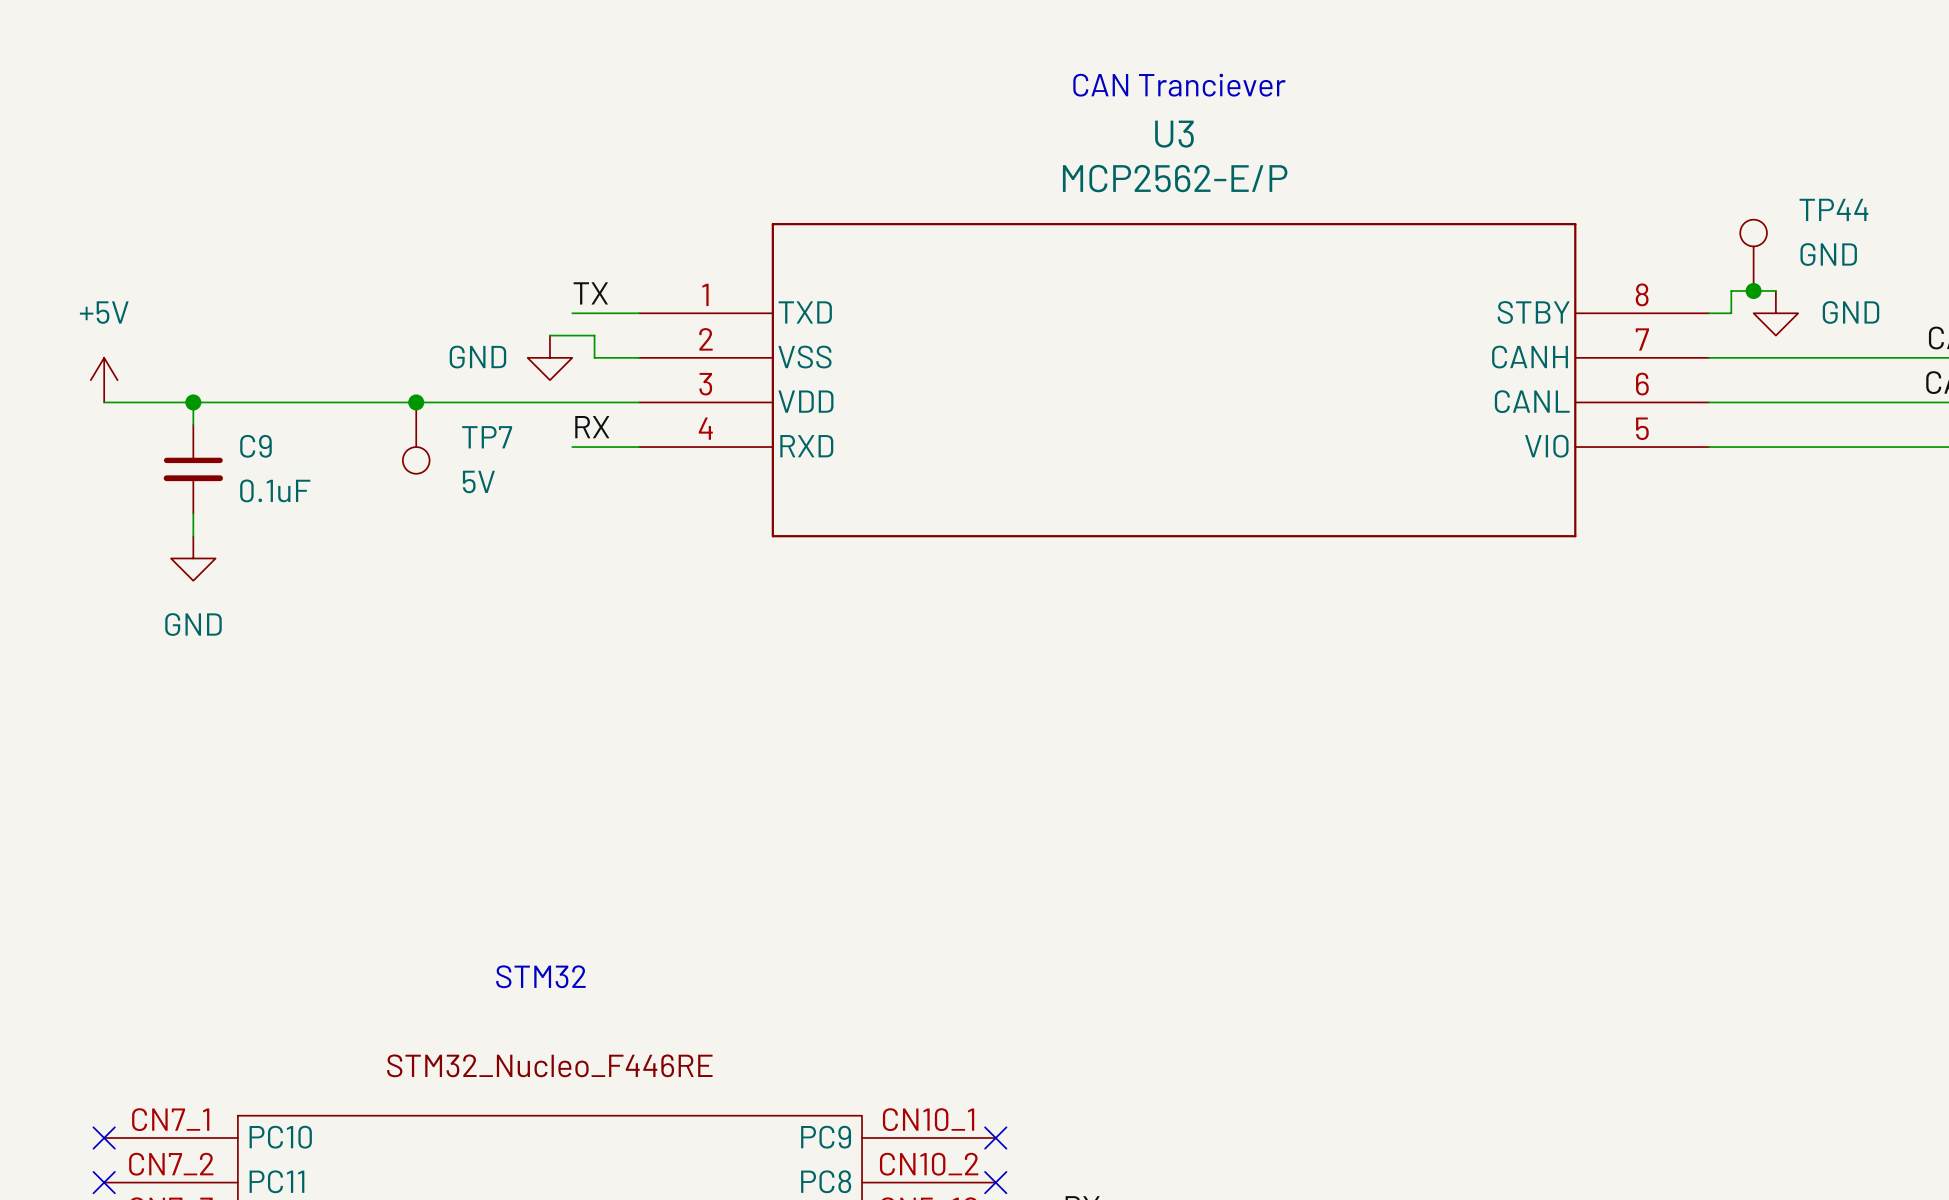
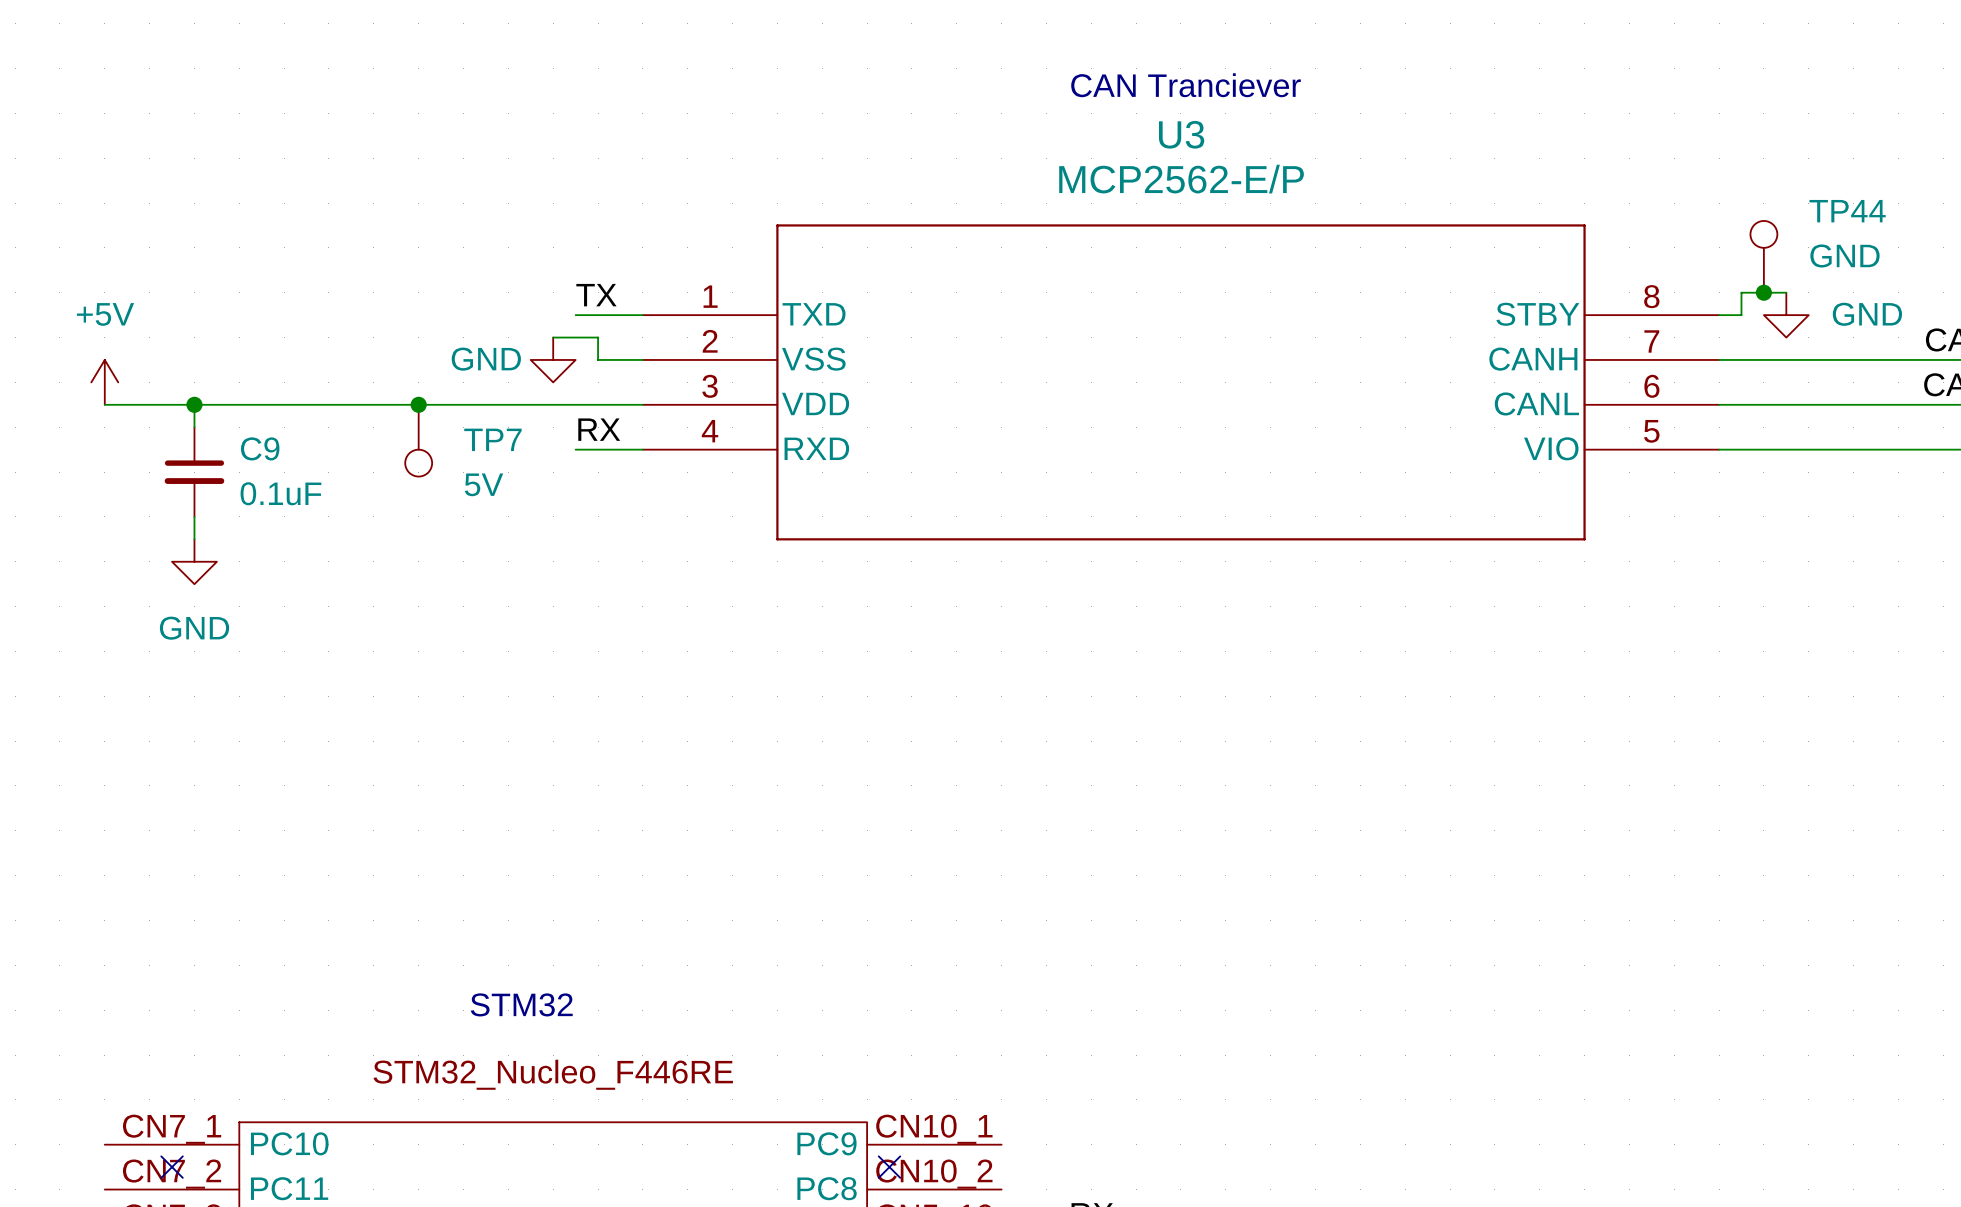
text position: STM32 (540, 976) -> STM32 (521, 1004)
no-connect mark: (104, 1138) -> none
no-connect mark: (995, 1138) -> none
no-connect mark: none -> (172, 1167)
no-connect mark: none -> (889, 1167)
no-connect mark: (104, 1182) -> none
no-connect mark: (995, 1182) -> none

